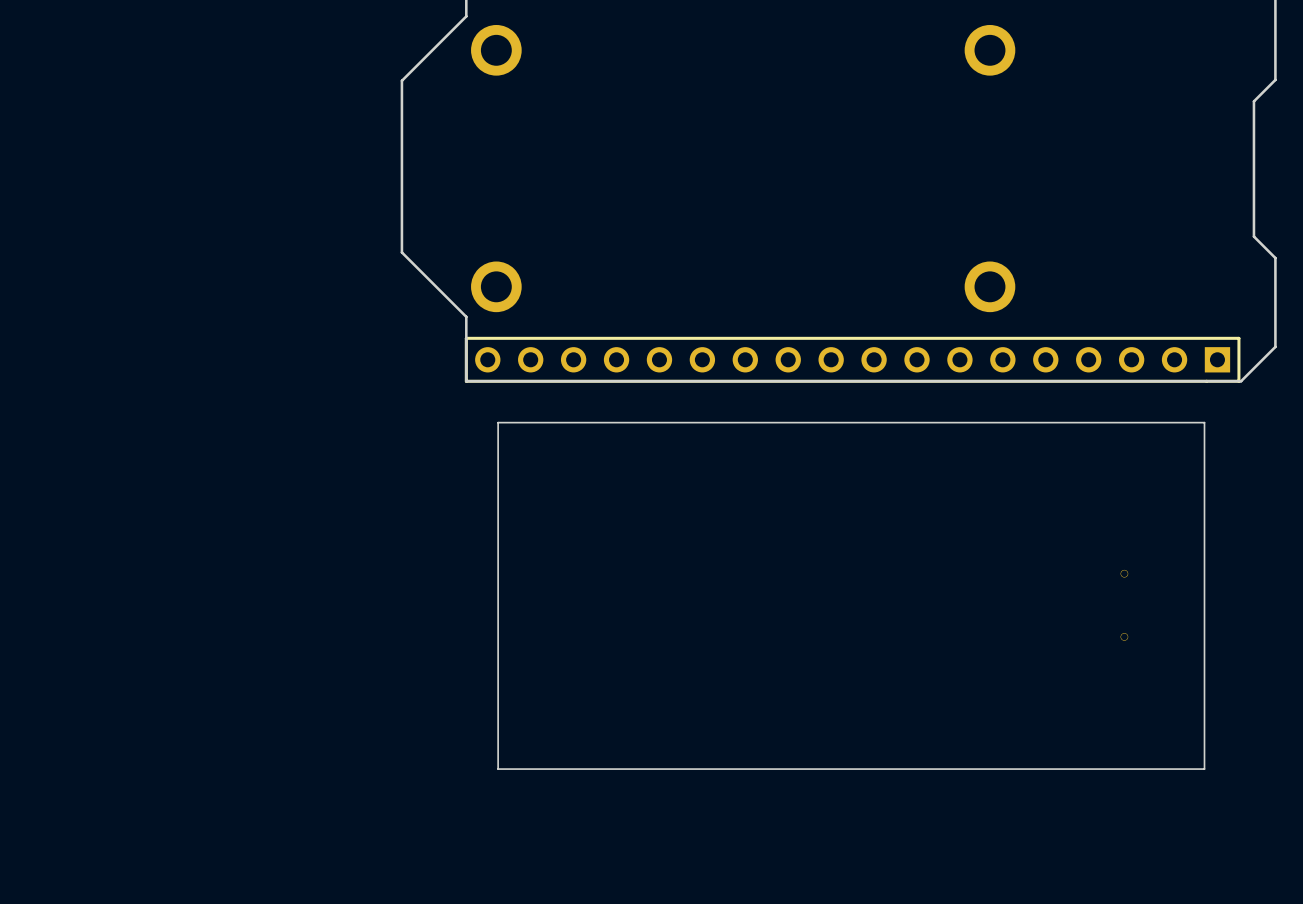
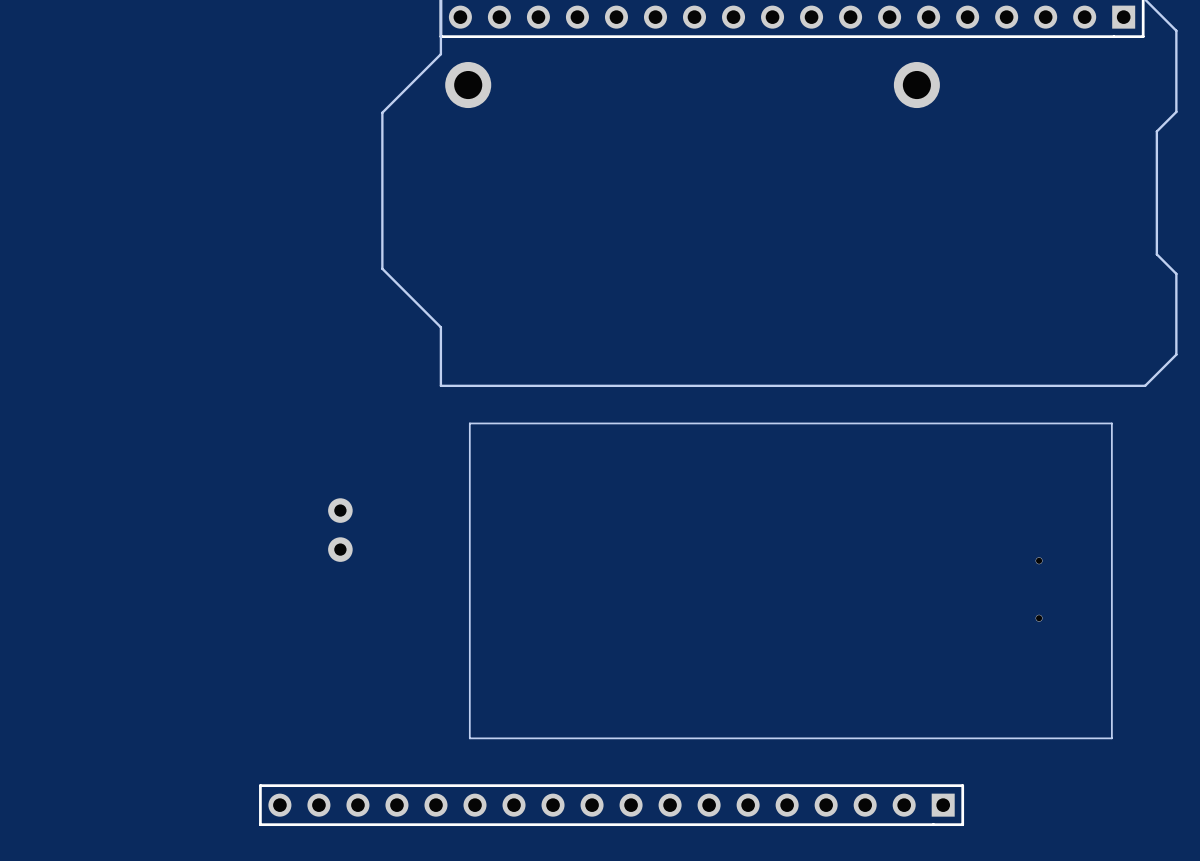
part: (496, 286) -> none
part: (989, 286) -> none
part: (852, 359) -> none
part: none -> (340, 530)
part: none -> (611, 805)

